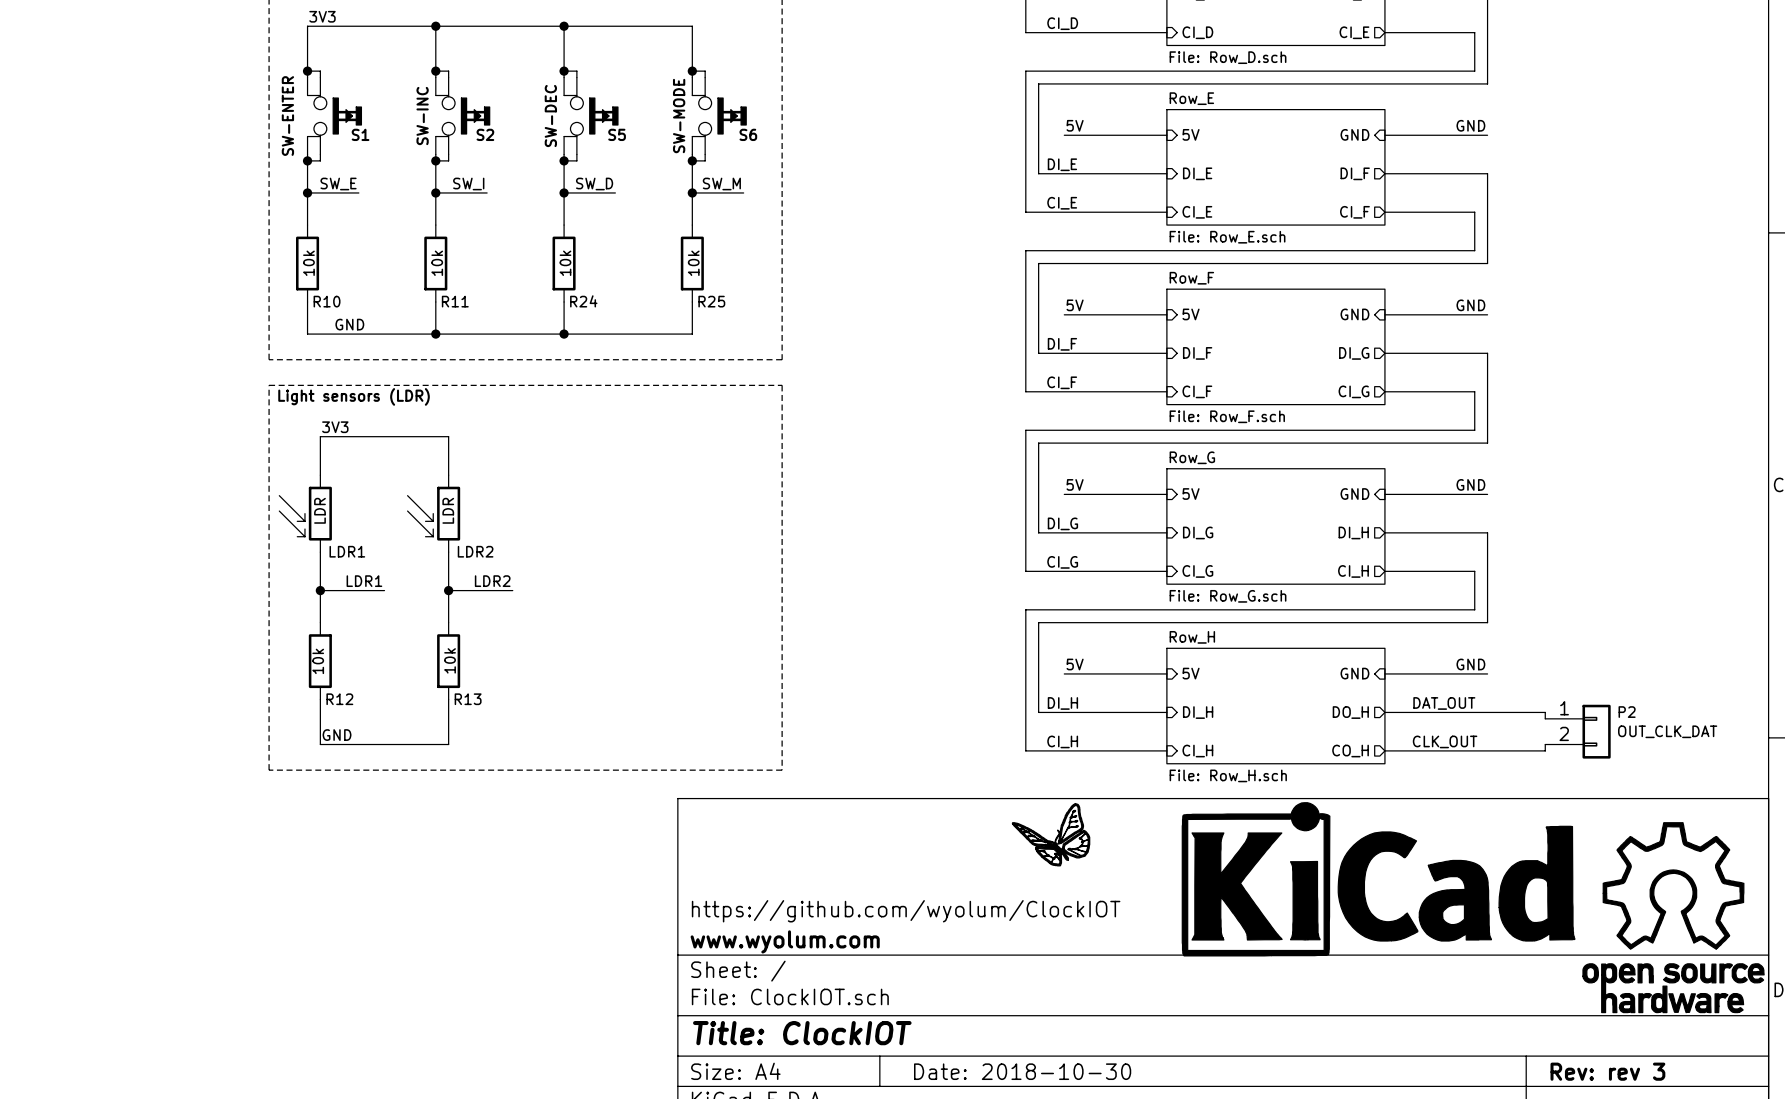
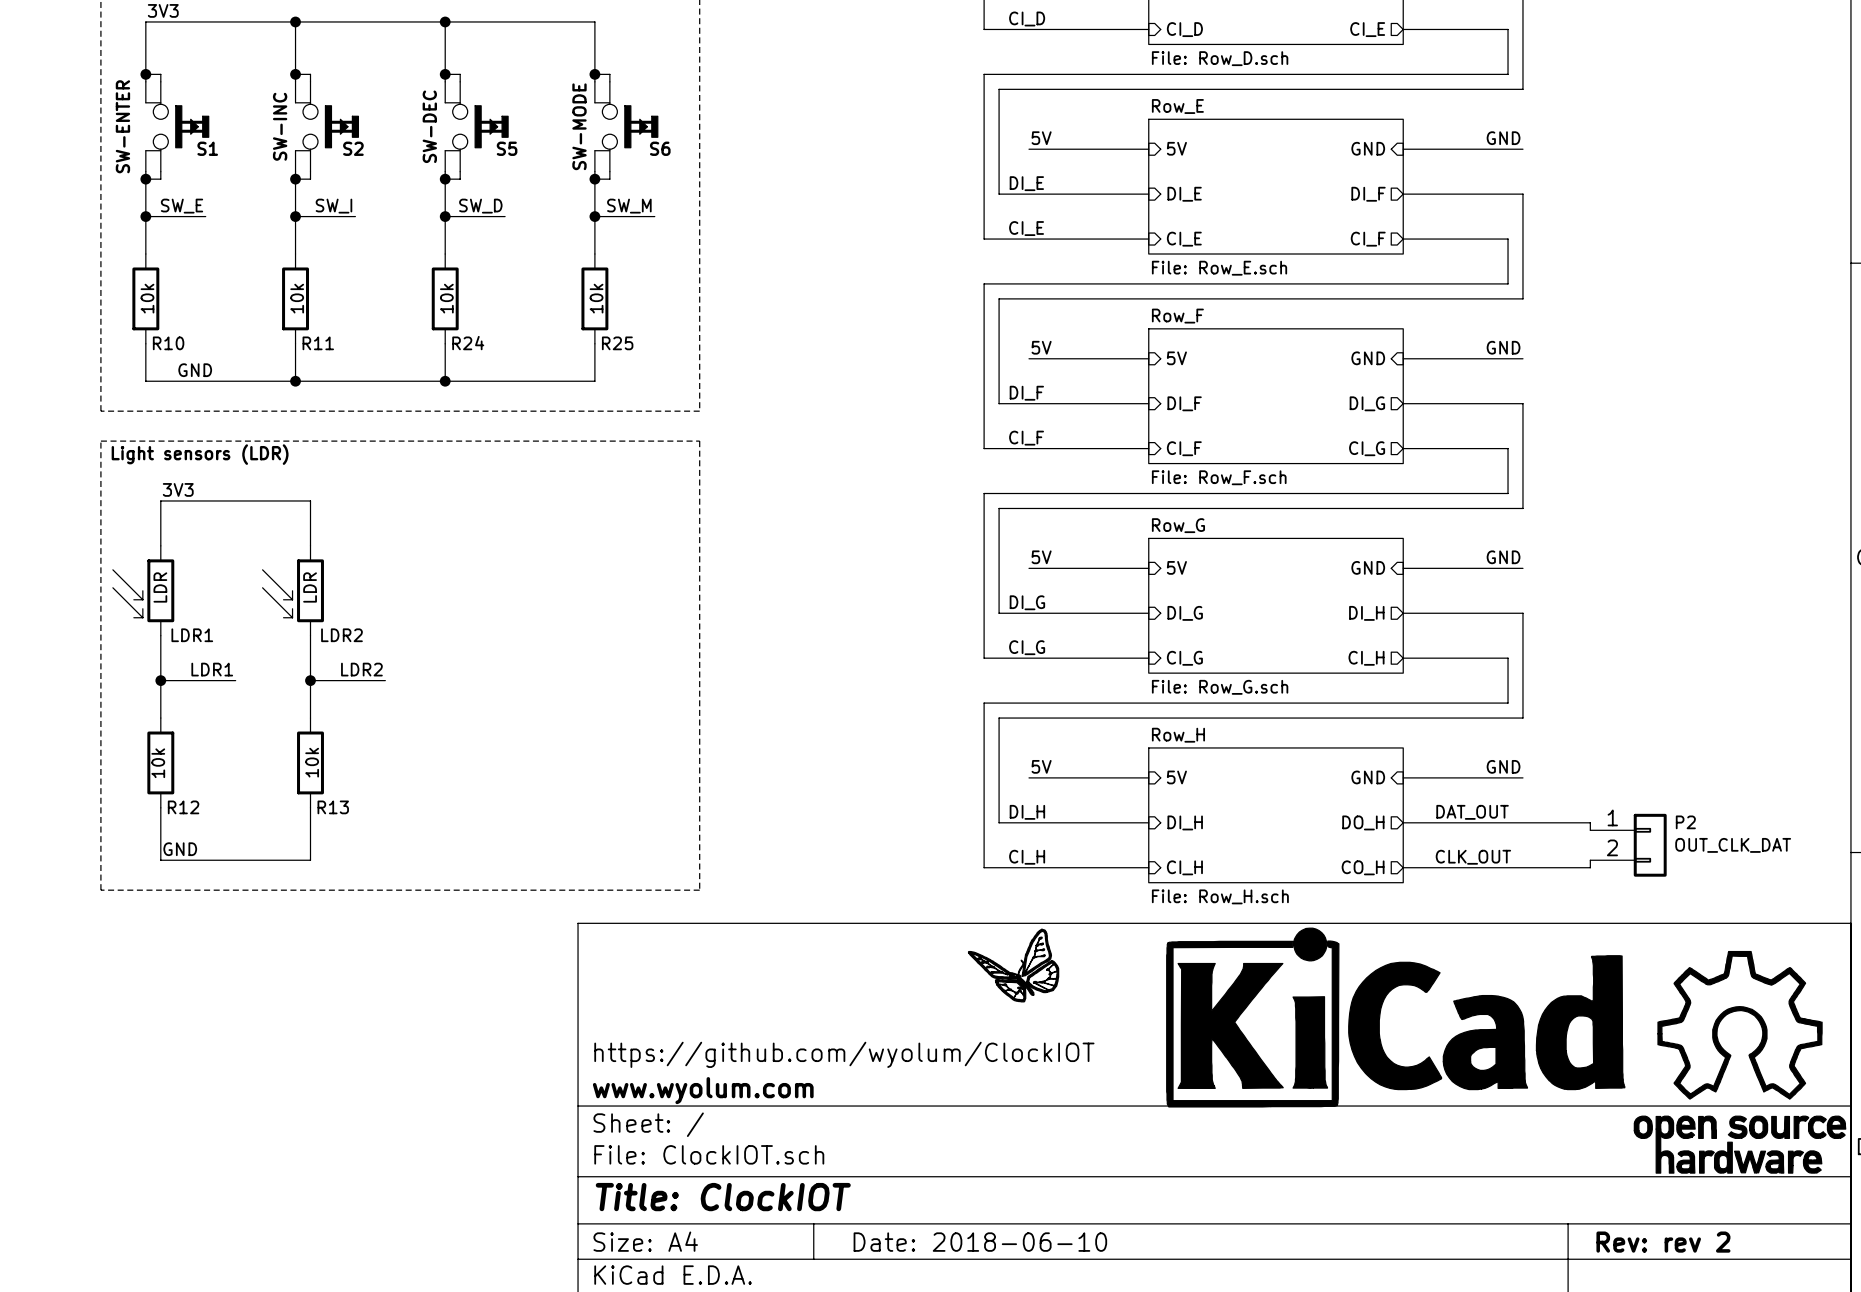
title block: Date: 2018-10-30 (1022, 1071) -> Date: 2018-06-10 (980, 1242)
title block: Rev: rev 3 (1607, 1071) -> Rev: rev 2 (1663, 1242)

